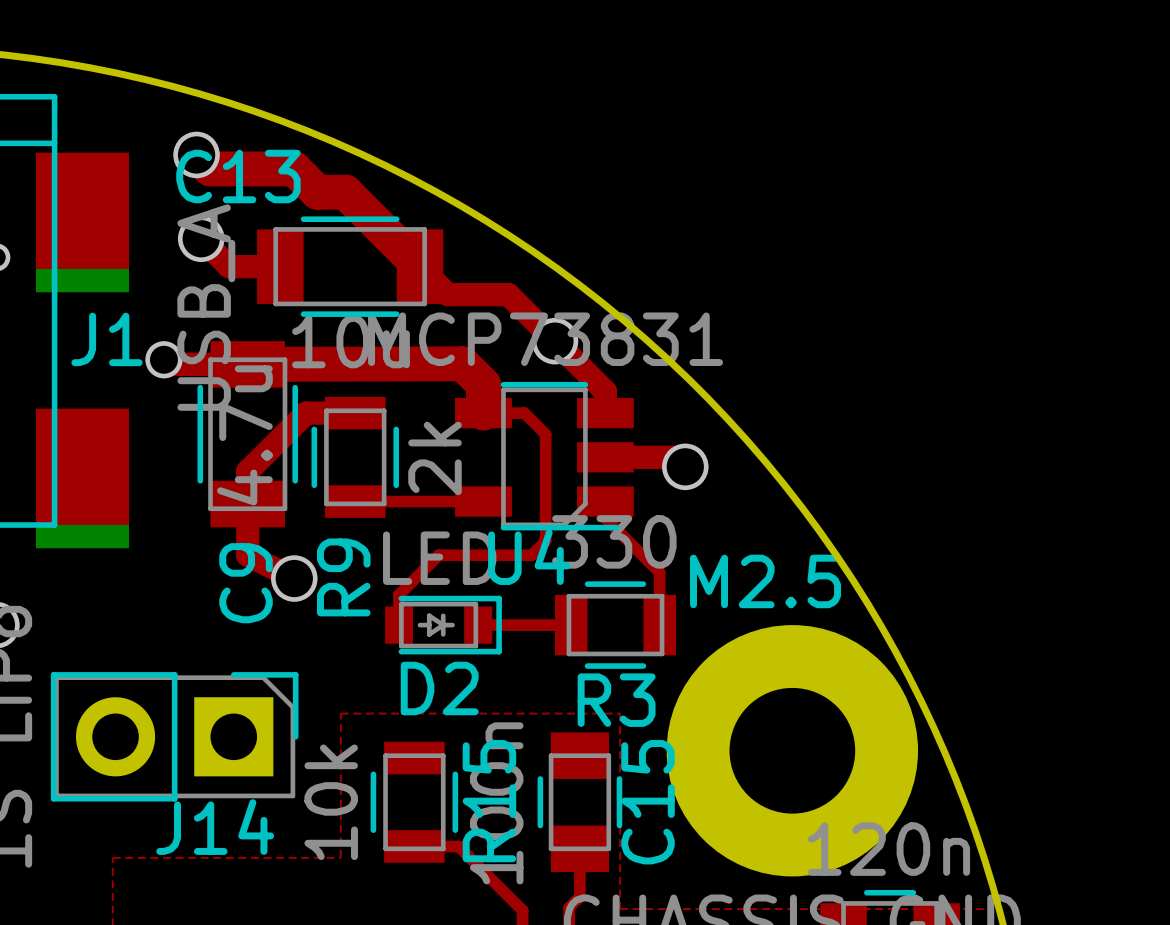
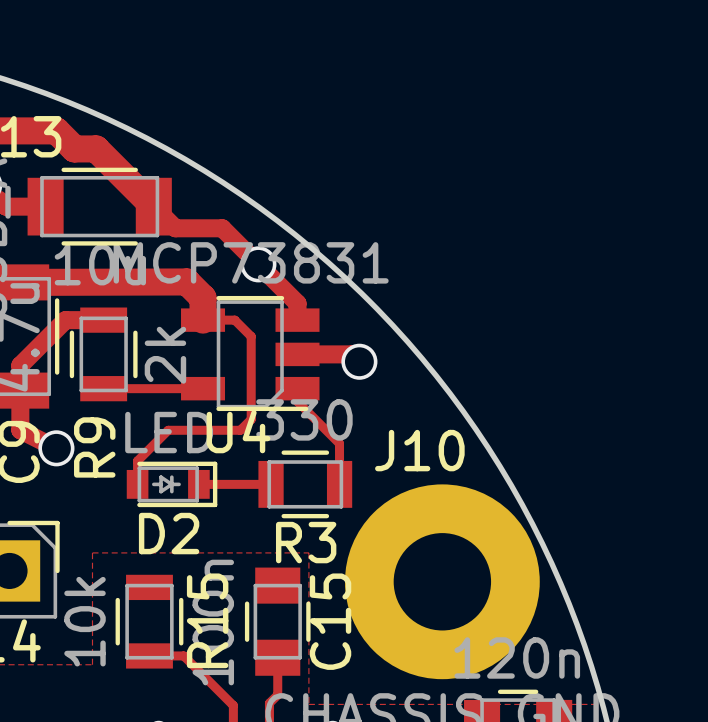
M2.5 name: M2.5 (765, 581) -> J10 (419, 450)

